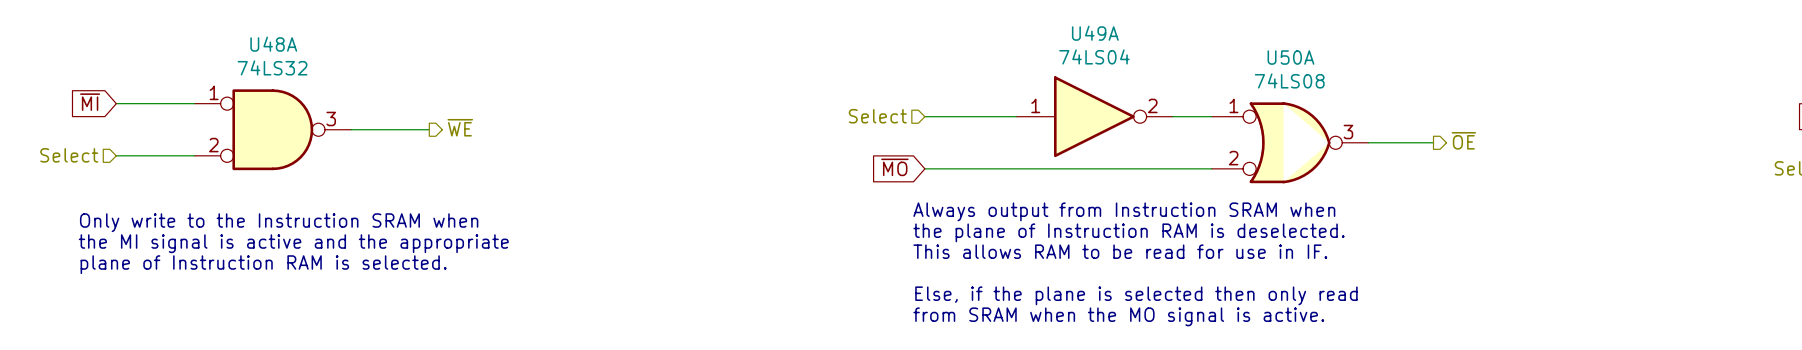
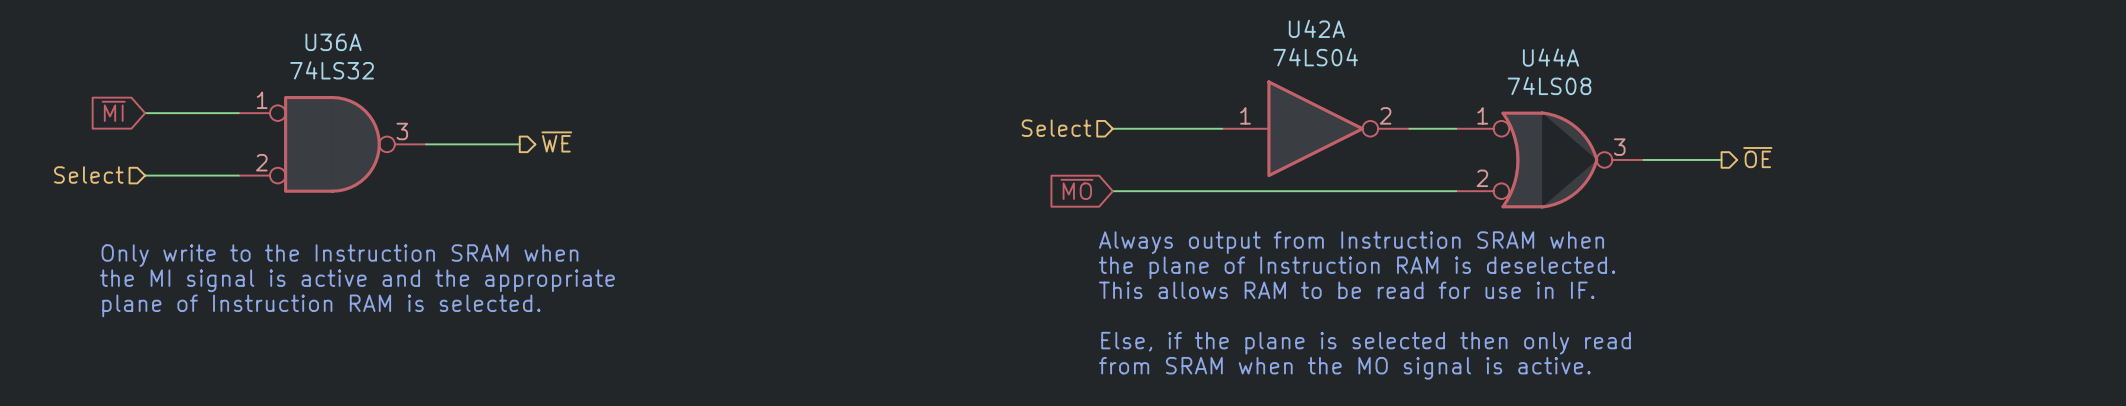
U49A name: U49A (1095, 33) -> U42A (1316, 28)
U48A name: U48A (273, 44) -> U36A (333, 42)
U50A name: U50A (1290, 57) -> U44A (1550, 57)

